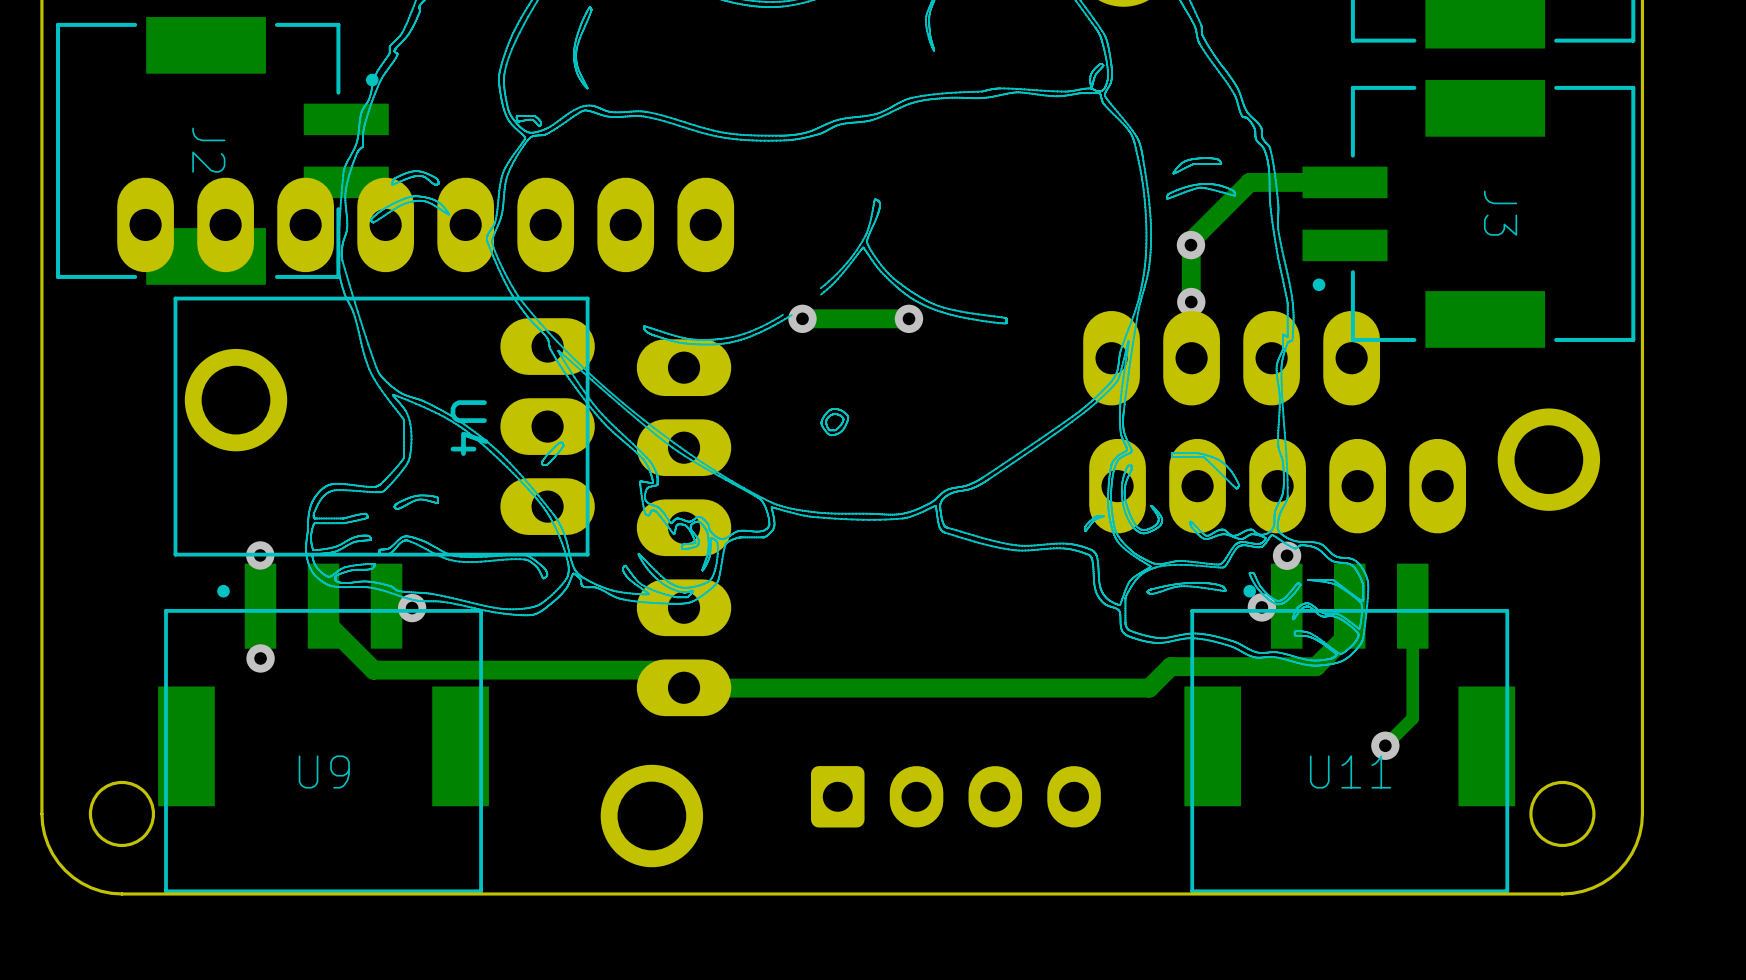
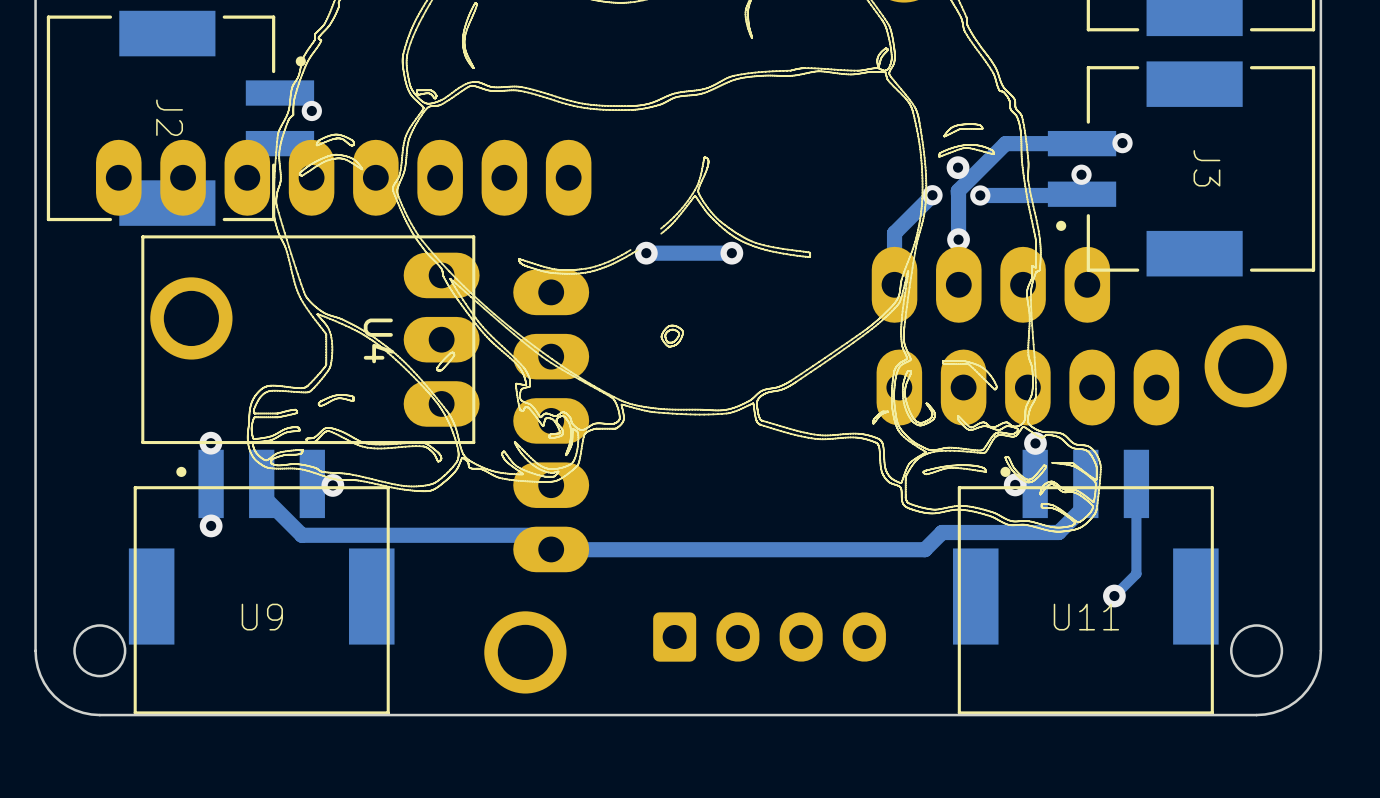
via: none -> (311, 110)
via: none -> (1122, 143)
track: none -> (1081, 174) (1080, 195) (980, 195)
via: none -> (1081, 174)
via position: (1190, 245) -> (958, 167)
track: none -> (932, 195) (894, 233) (894, 284)
via: none -> (932, 195)
via: none -> (980, 195)

